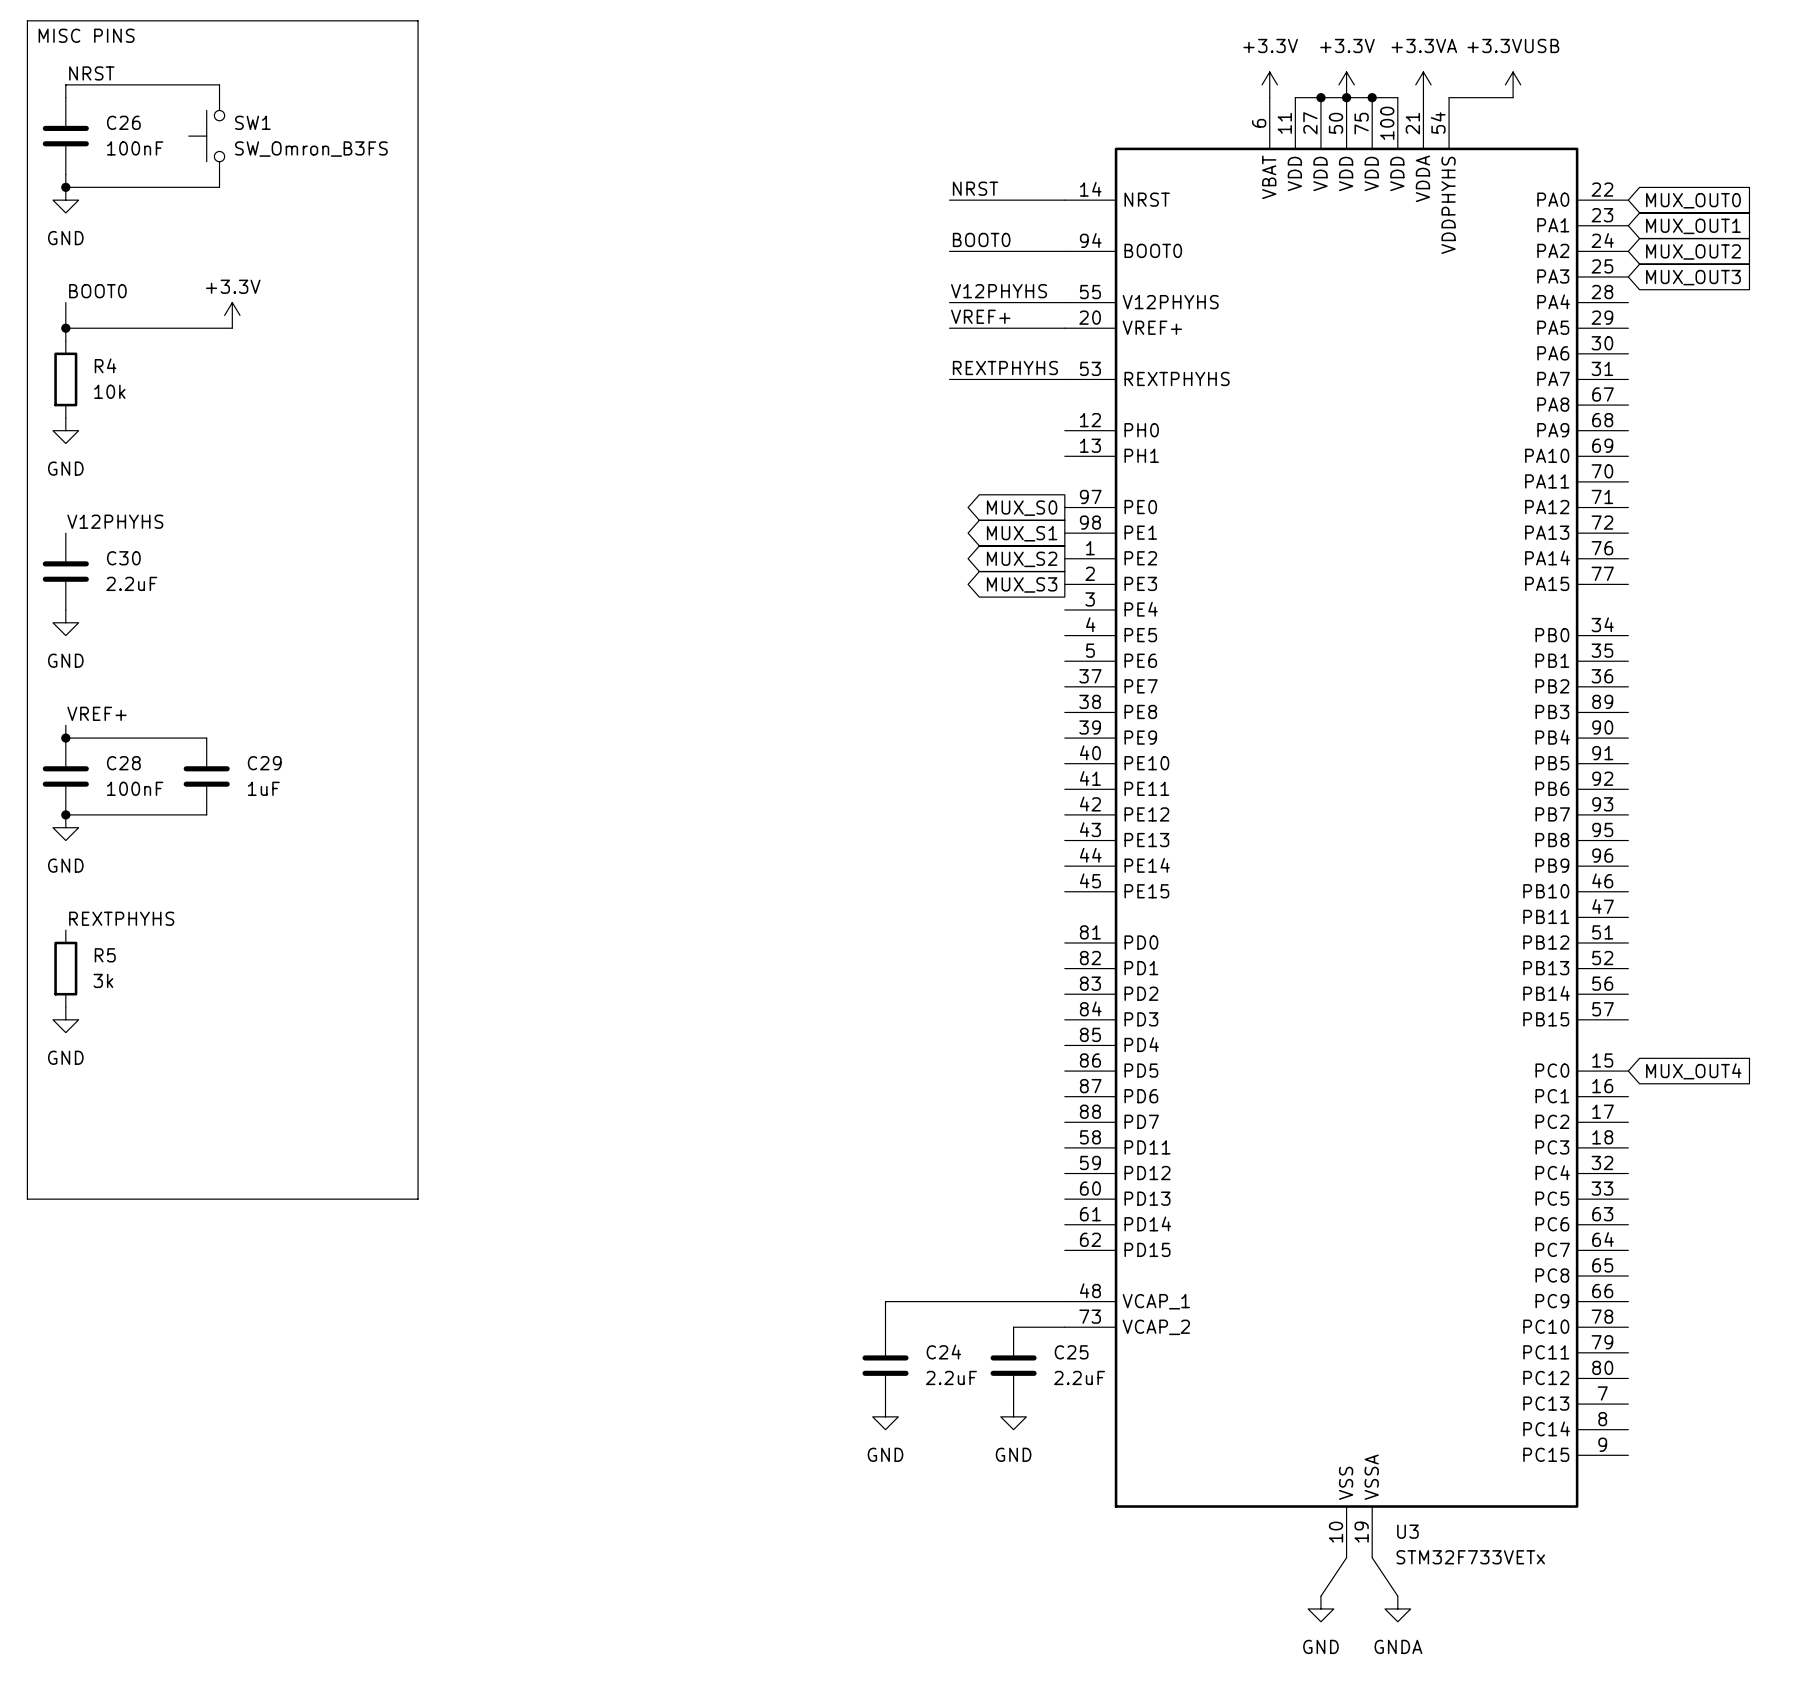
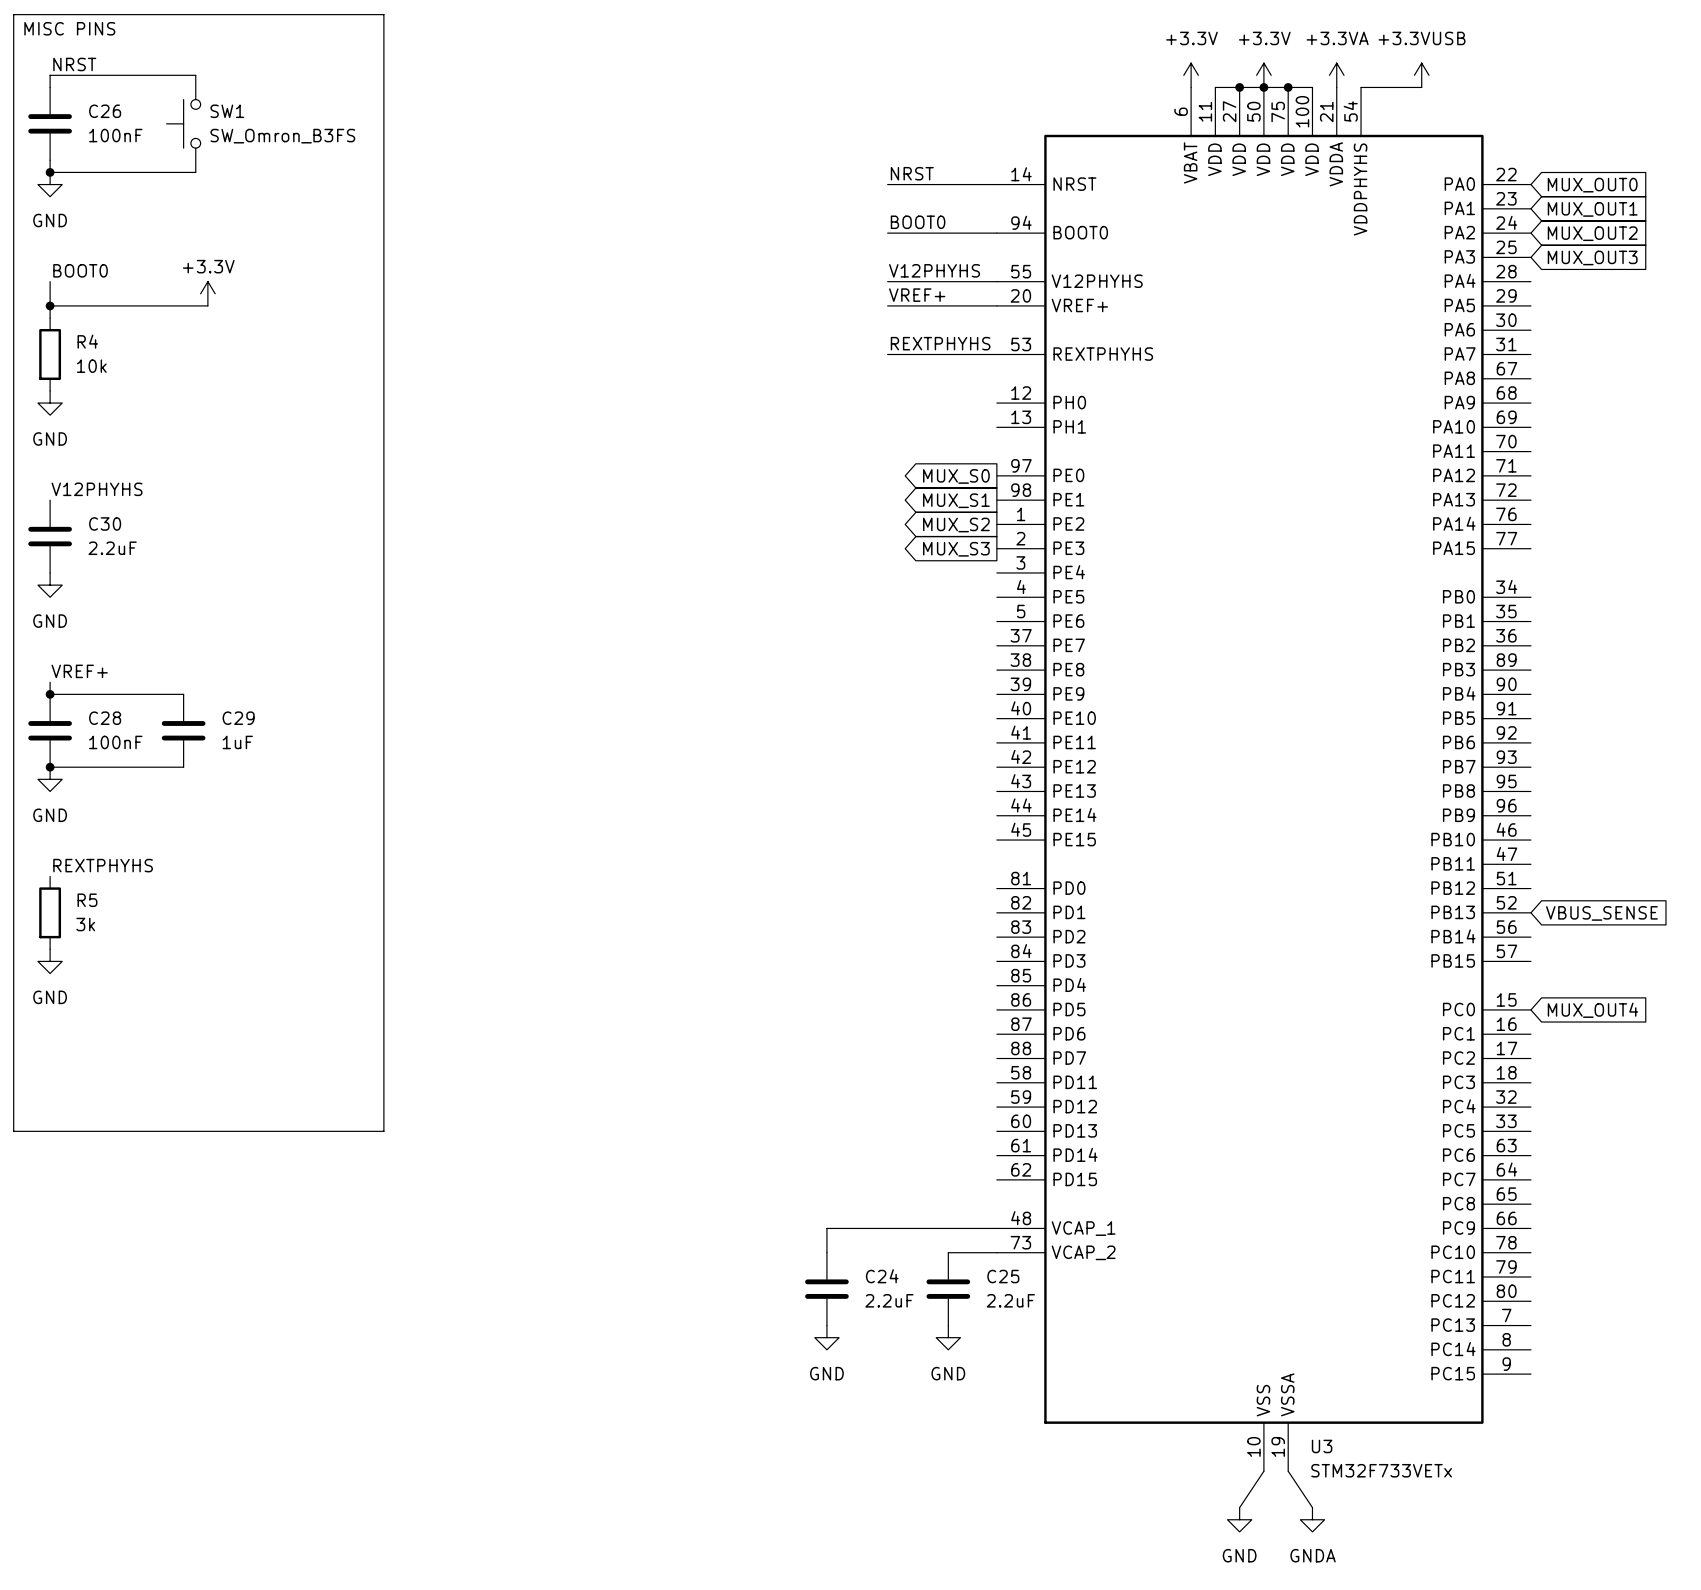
global label: none -> VBUS_SENSE (1601, 913)

